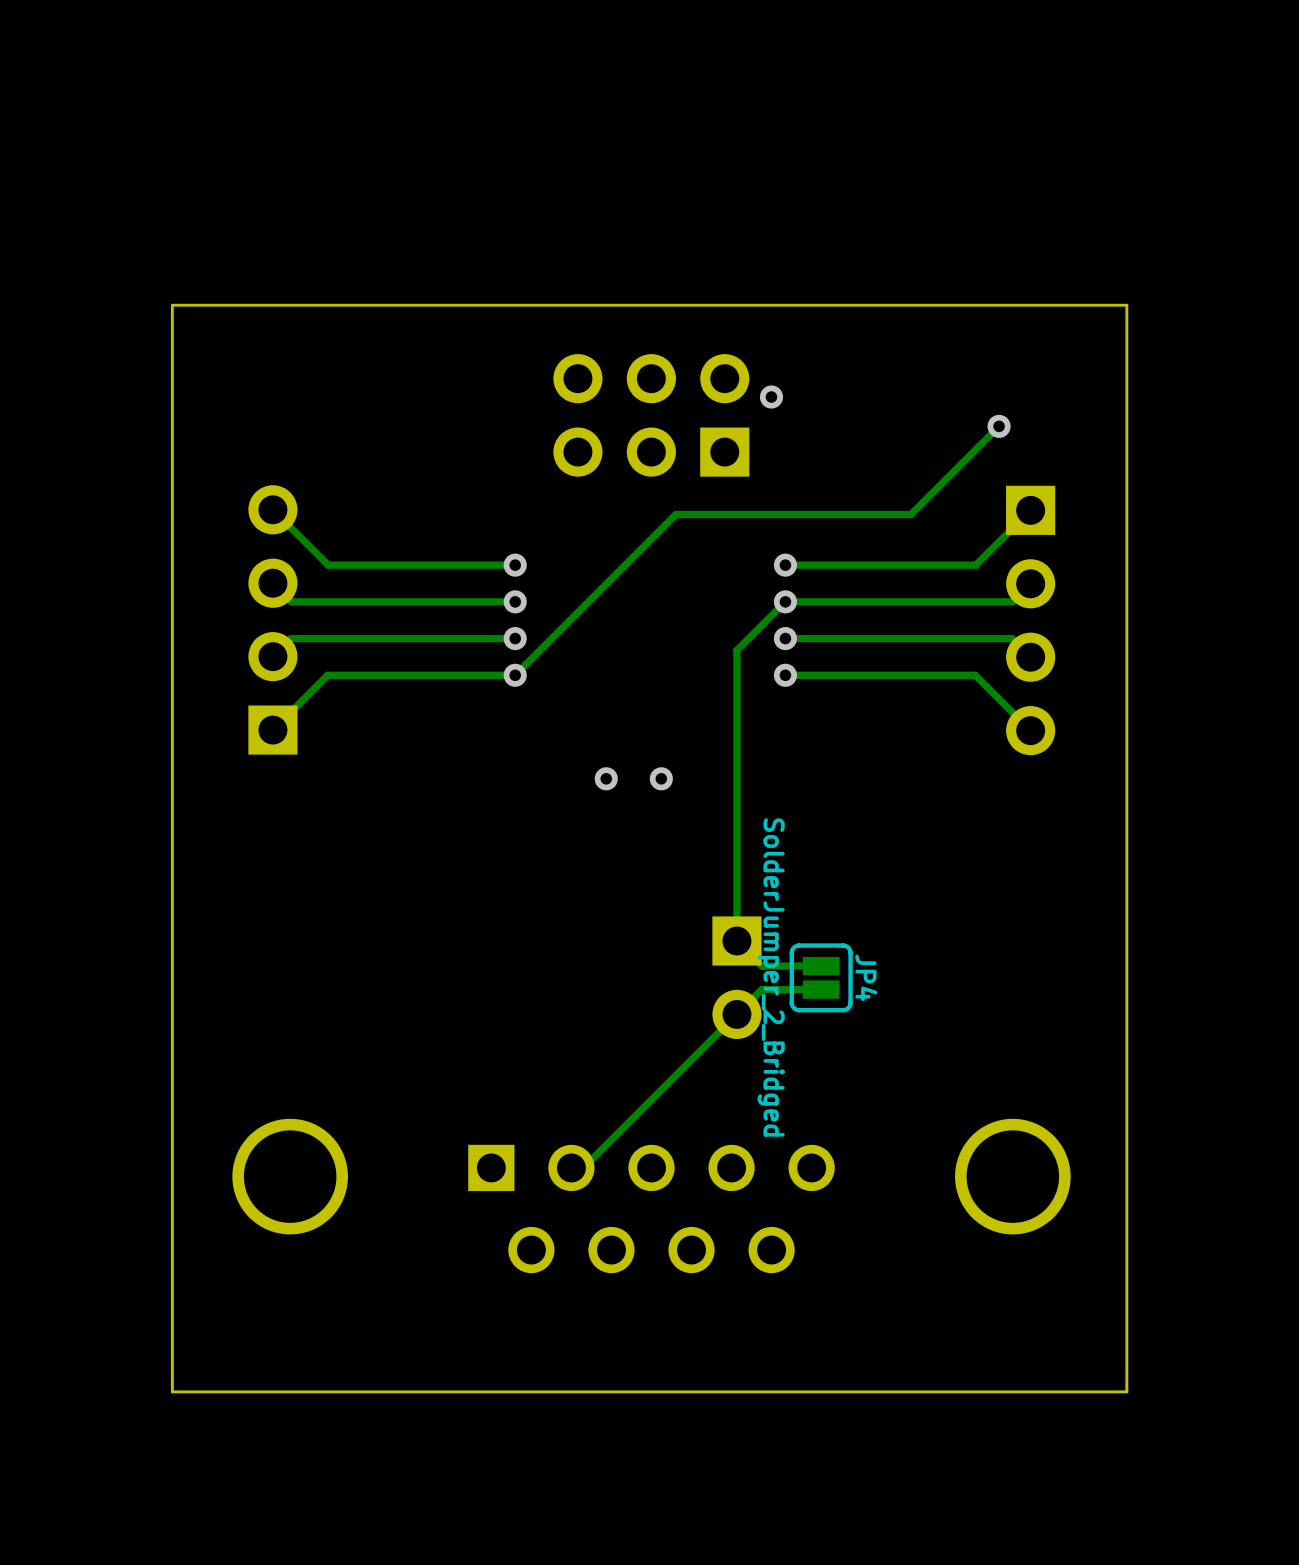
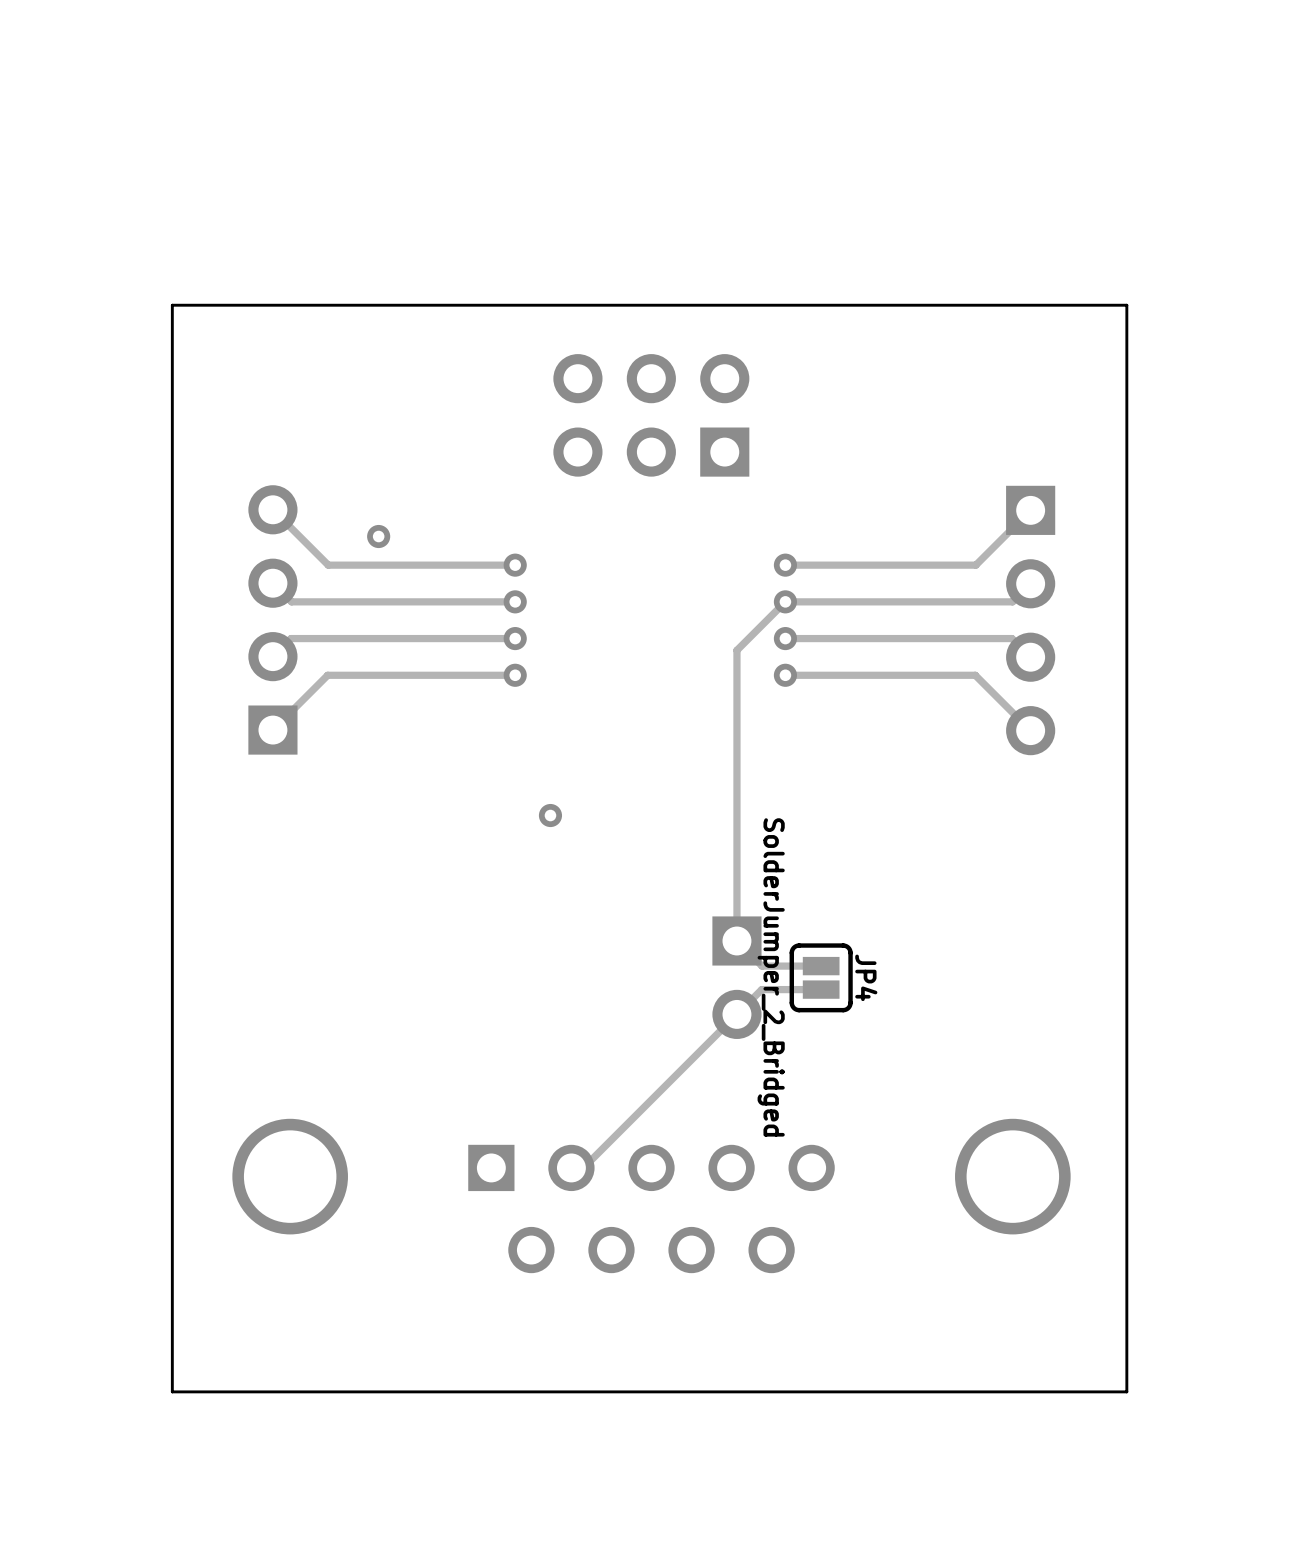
via: (771, 397) -> none
track: (999, 426) (910, 514) (676, 514) (515, 675) -> none
via: (999, 426) -> none
via: none -> (378, 536)
via: (606, 778) -> none
via: (661, 778) -> none
via: none -> (550, 815)

